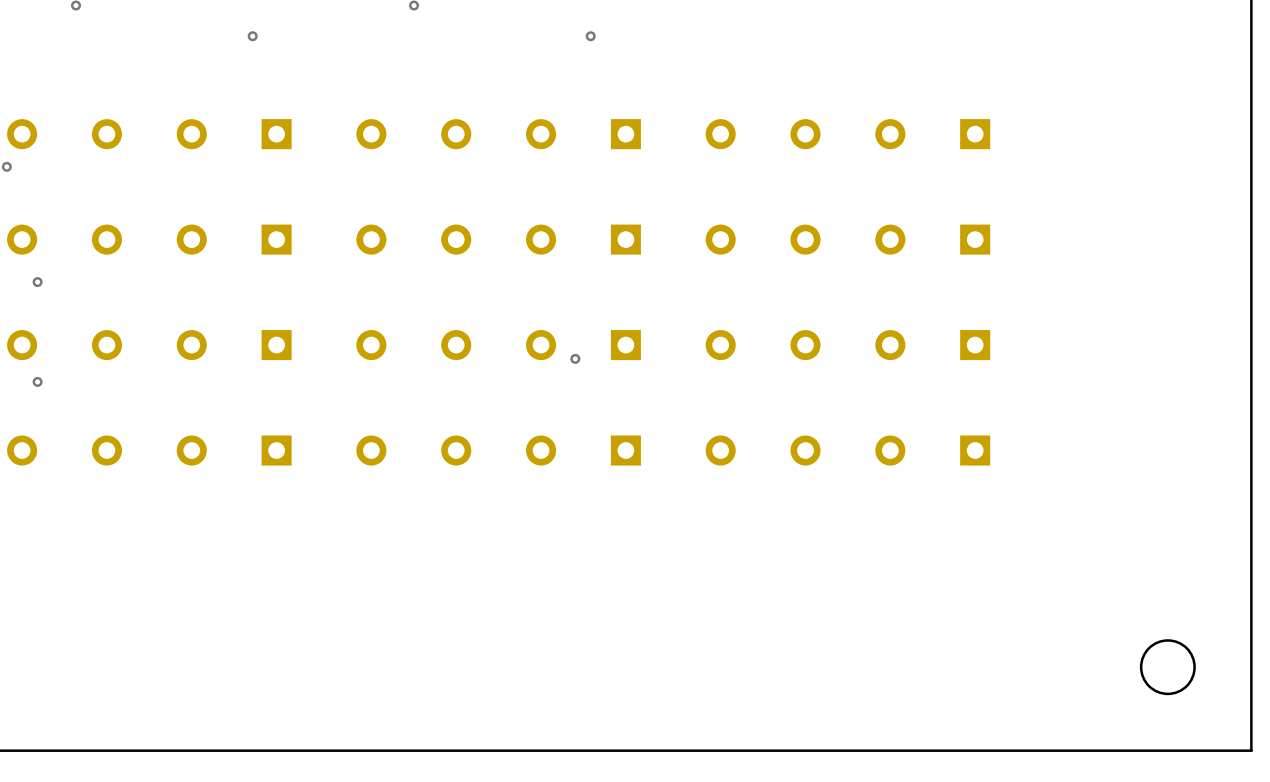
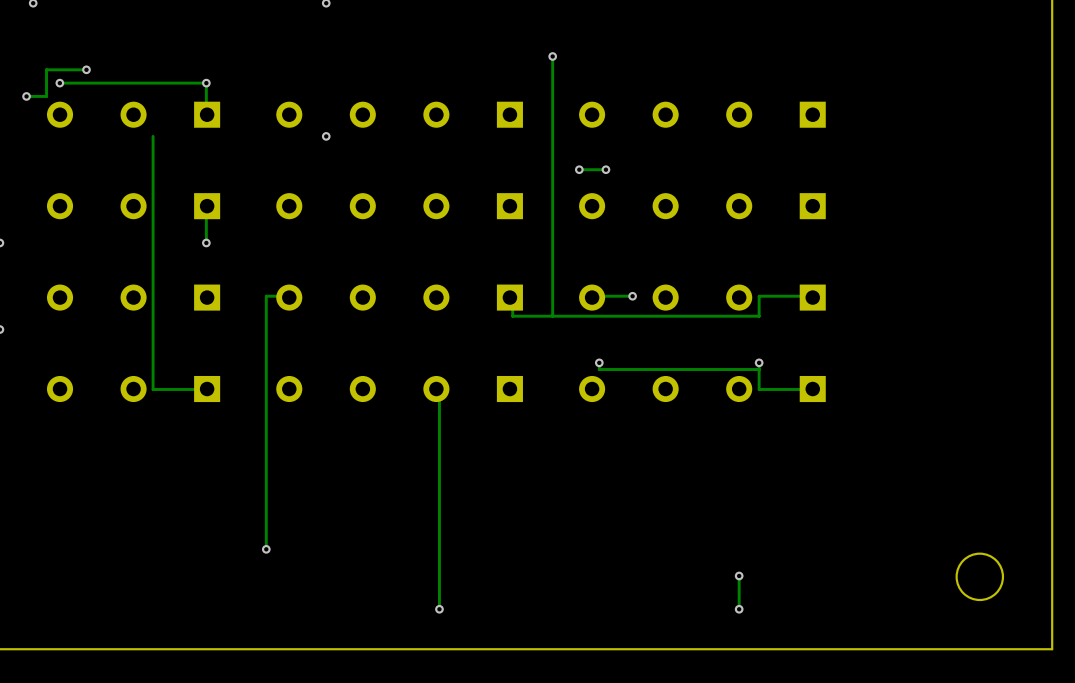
via: (252, 36) -> none
via position: (590, 36) -> (552, 56)
track: none -> (552, 56) (552, 316)
track: none -> (86, 69) (46, 69) (46, 96) (26, 96)
via: none -> (86, 69)
track: none -> (59, 83) (206, 83) (206, 116)
via: none -> (59, 83)
via: none -> (206, 83)
via: none -> (26, 96)
track: none -> (153, 136) (153, 389) (206, 389)
via: none -> (326, 136)
via: none -> (579, 169)
track: none -> (605, 169) (579, 169)
via: none -> (605, 169)
track: none -> (206, 203) (206, 242)
via: none -> (206, 242)
track: none -> (286, 296) (266, 296) (266, 549)
track: none -> (632, 296) (592, 296)
via: none -> (632, 296)
track: none -> (812, 296) (759, 296) (759, 316) (512, 316) (512, 296)
via: (575, 358) -> none
track: none -> (599, 362) (599, 369) (759, 369)
via: none -> (599, 362)
track: none -> (759, 362) (759, 389) (812, 389)
via: none -> (759, 362)
track: none -> (439, 389) (439, 609)
via: none -> (266, 549)
track: none -> (739, 575) (739, 609)
via: none -> (739, 575)
via: none -> (439, 609)
via: none -> (739, 609)

